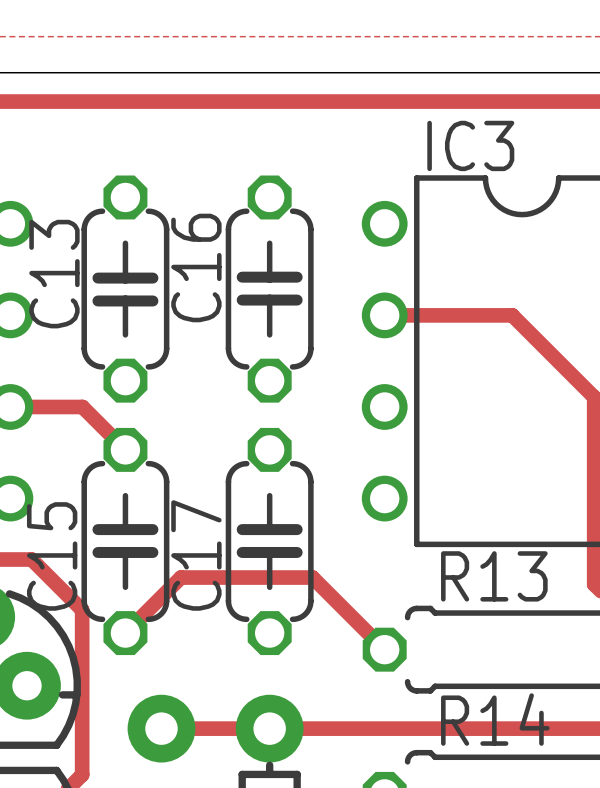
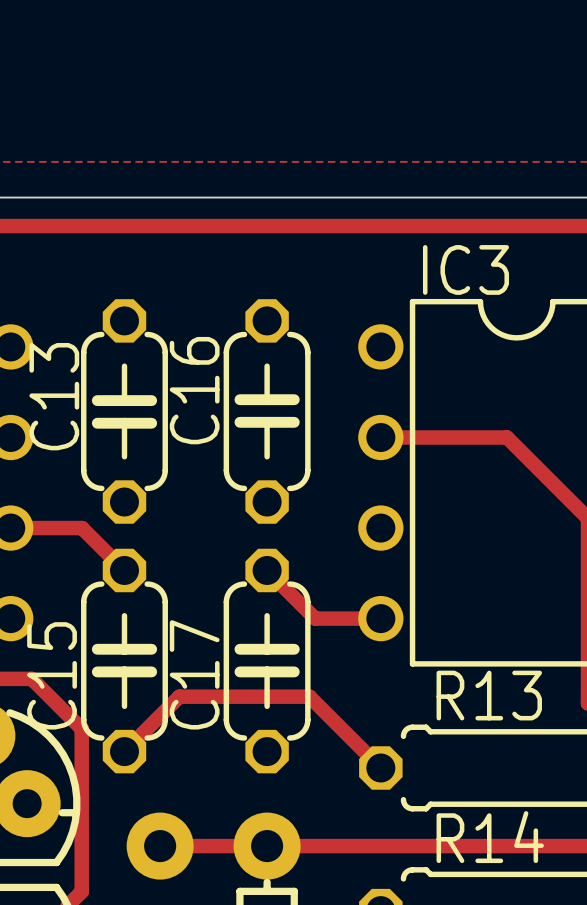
track: none -> (267, 570) (315, 618) (380, 618)

